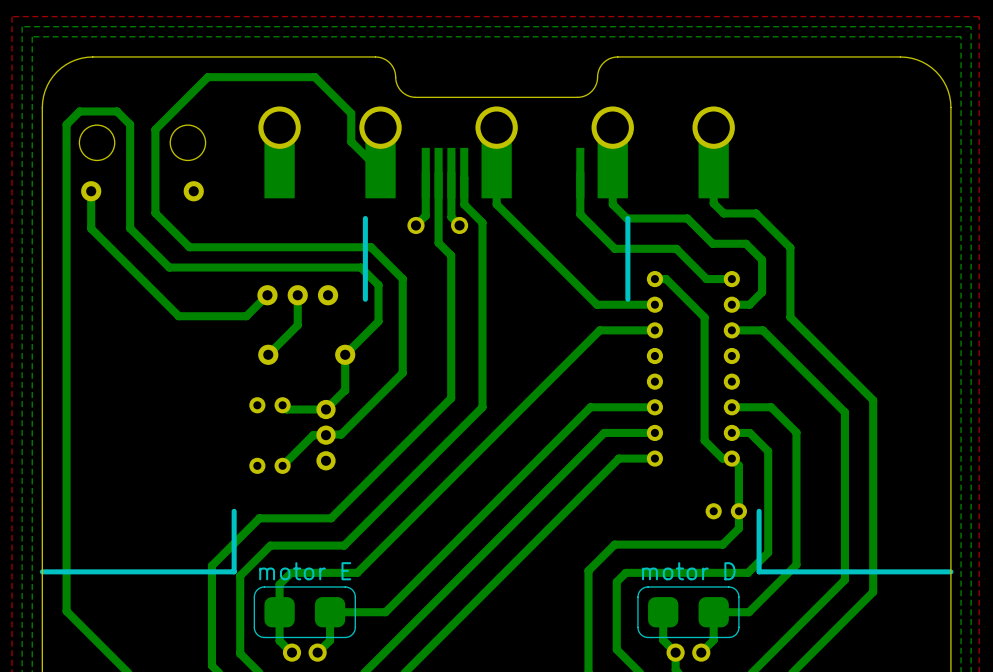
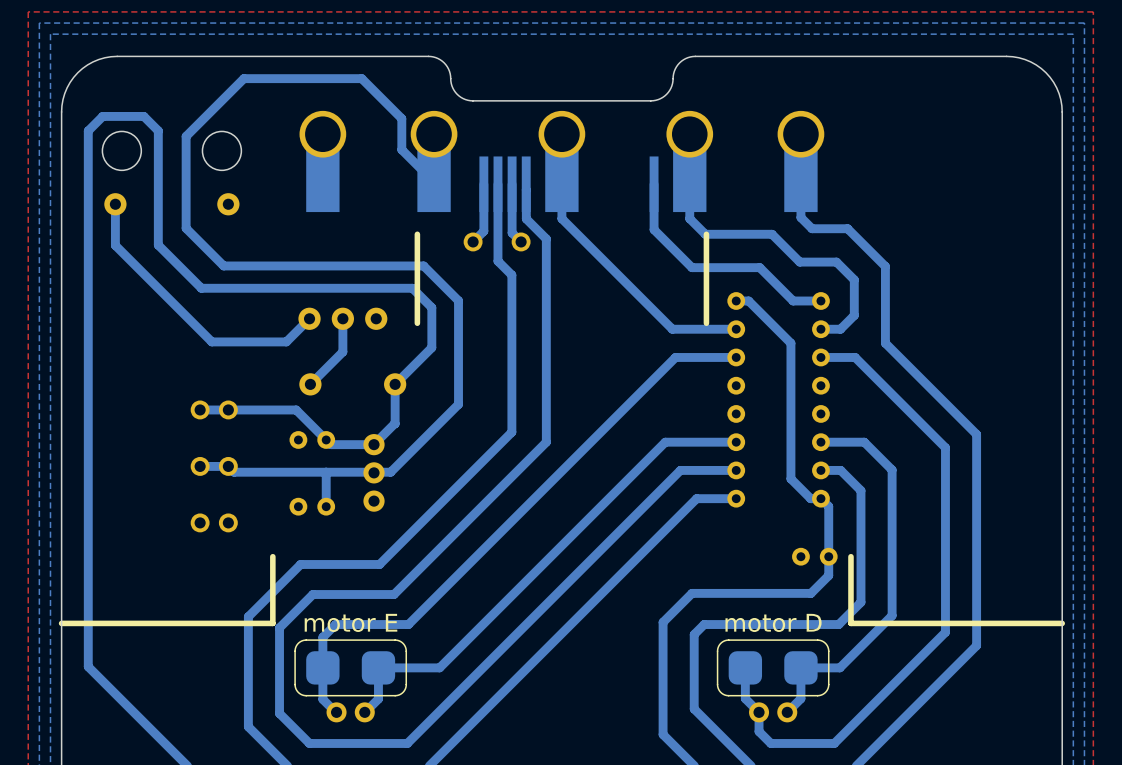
bottom track: none -> (202, 409) (296, 409) (326, 439)
part: none -> (214, 409)
bottom track: none -> (200, 466) (228, 466) (234, 472) (374, 472)
part: none -> (214, 466)
bottom track: (326, 434) (313, 435) (282, 465) -> (326, 472) (326, 506)
part: none -> (214, 522)

